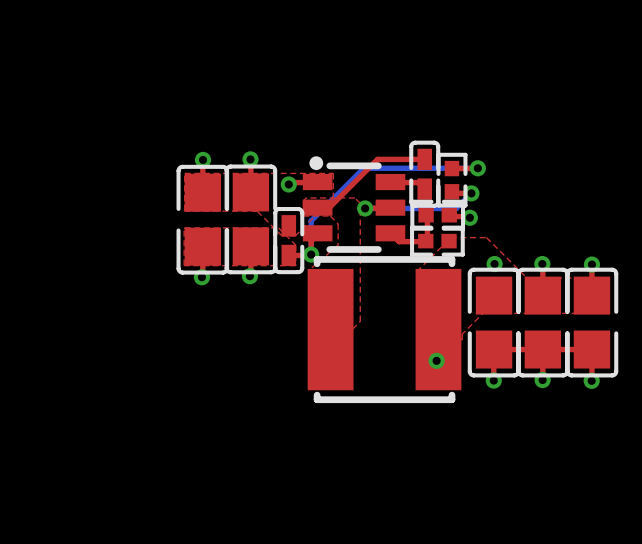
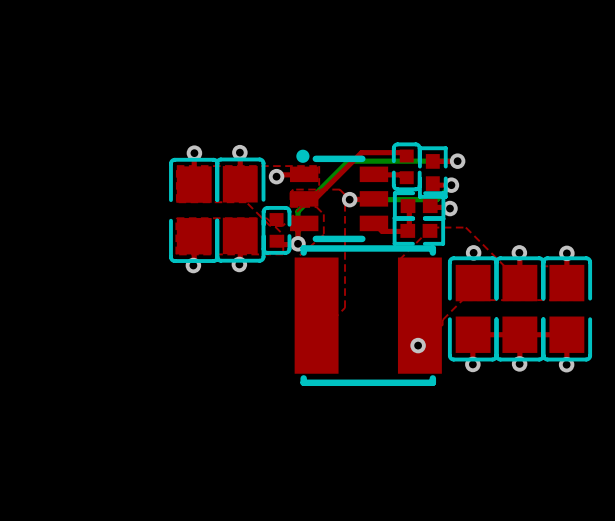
part footprint: [409, 140, 441, 208] -> [391, 142, 422, 192]
part footprint: [273, 206, 305, 275] -> [261, 205, 292, 255]

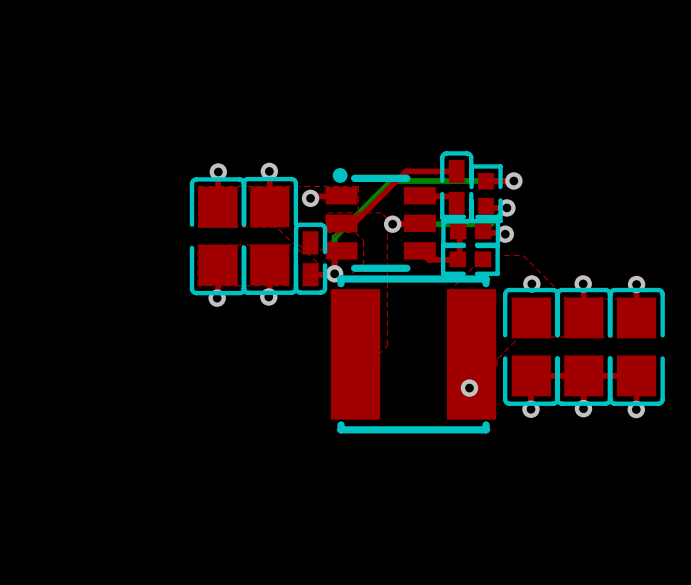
part footprint: [391, 142, 422, 192] -> [440, 151, 474, 224]
part footprint: [261, 205, 292, 255] -> [293, 222, 328, 295]

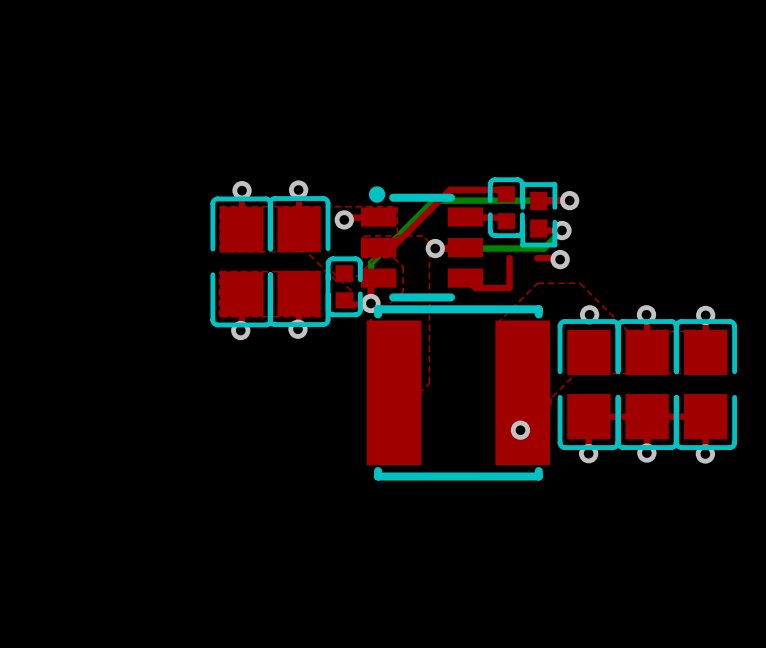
part footprint: [440, 151, 474, 224] -> [487, 177, 525, 239]
part footprint: [293, 222, 328, 295] -> [325, 256, 363, 318]
part: (470, 231) -> none
part: (470, 259) -> none

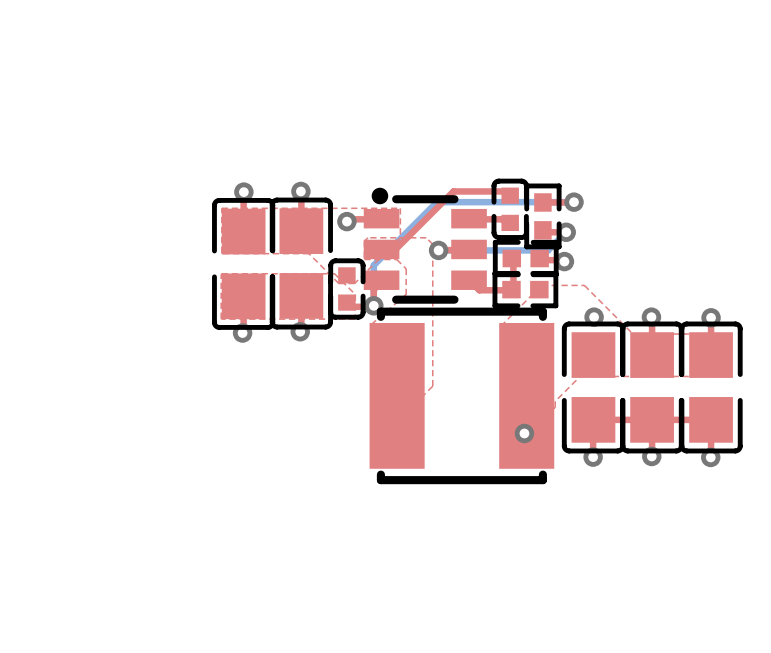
part: none -> (525, 258)
part: none -> (525, 289)

